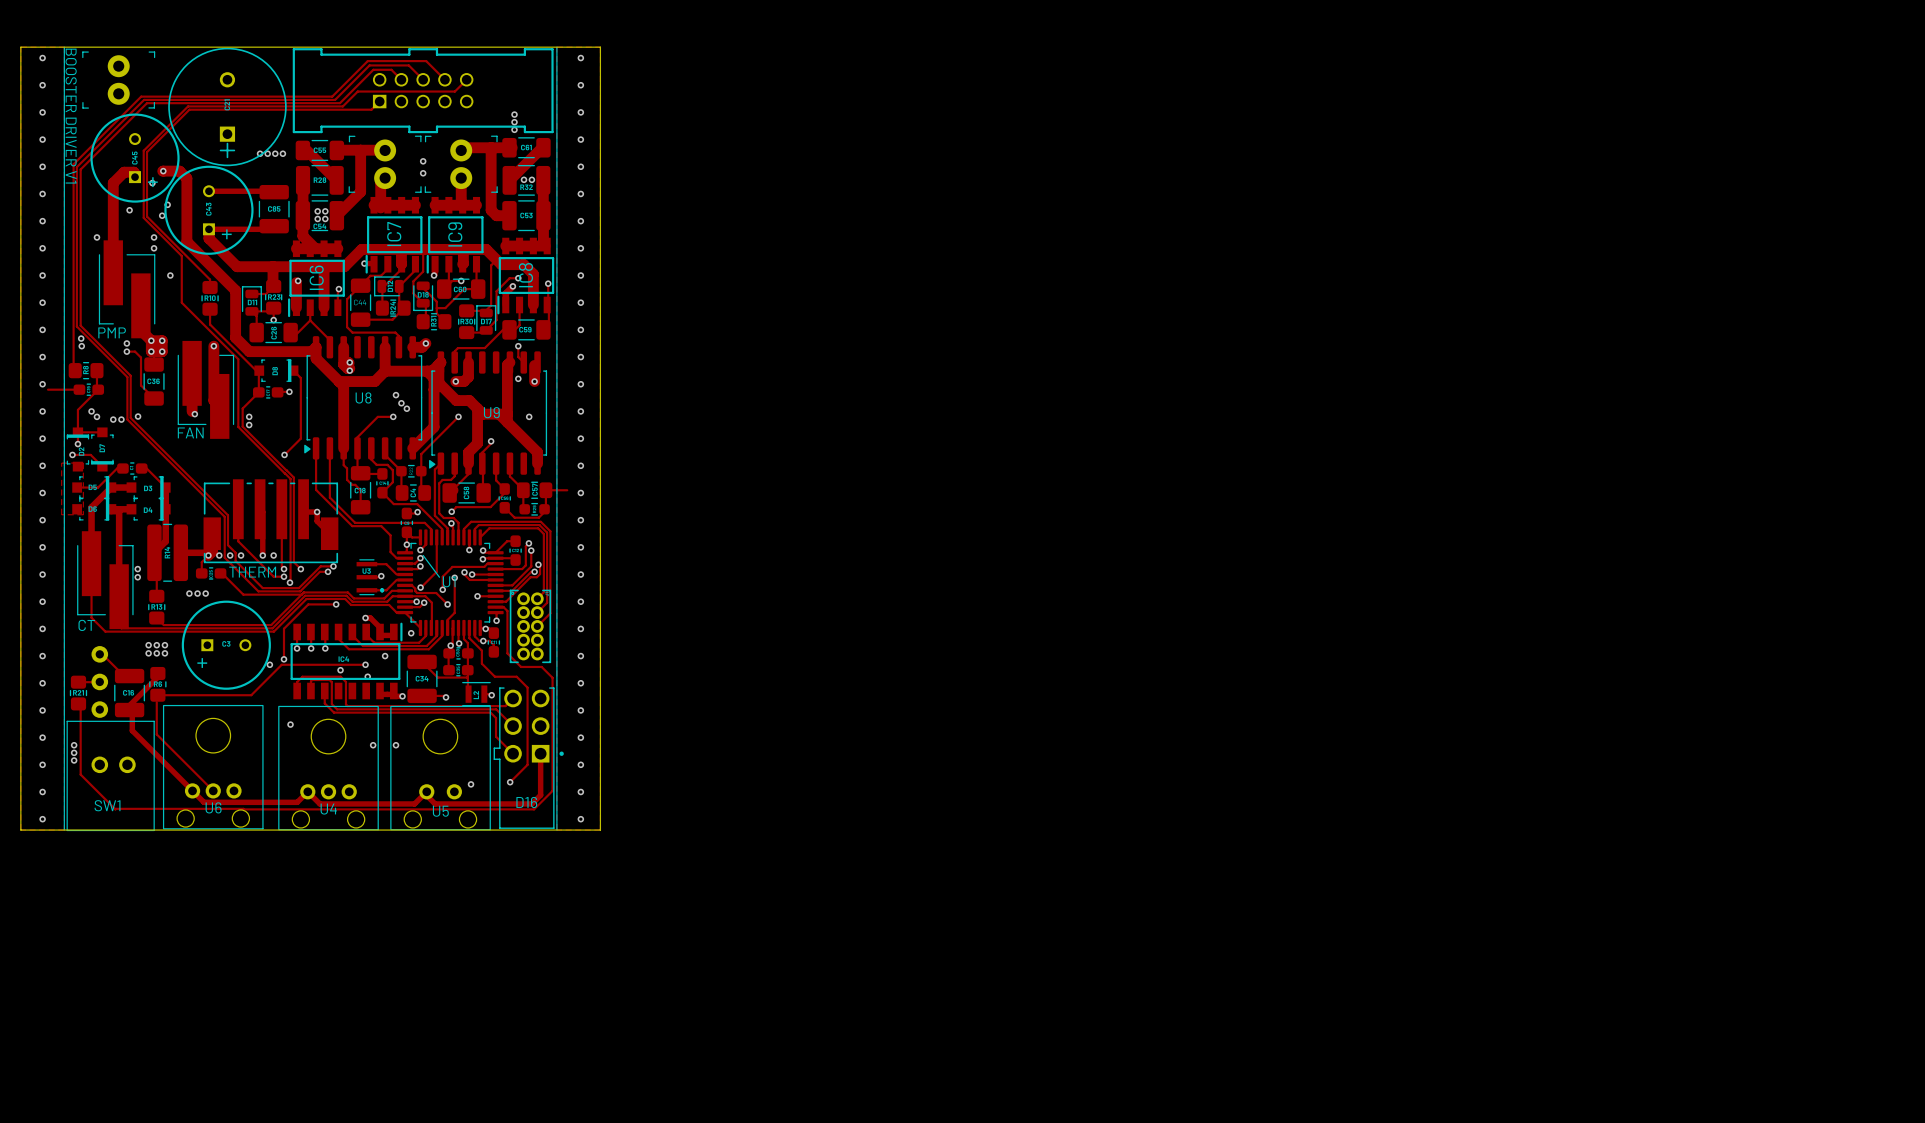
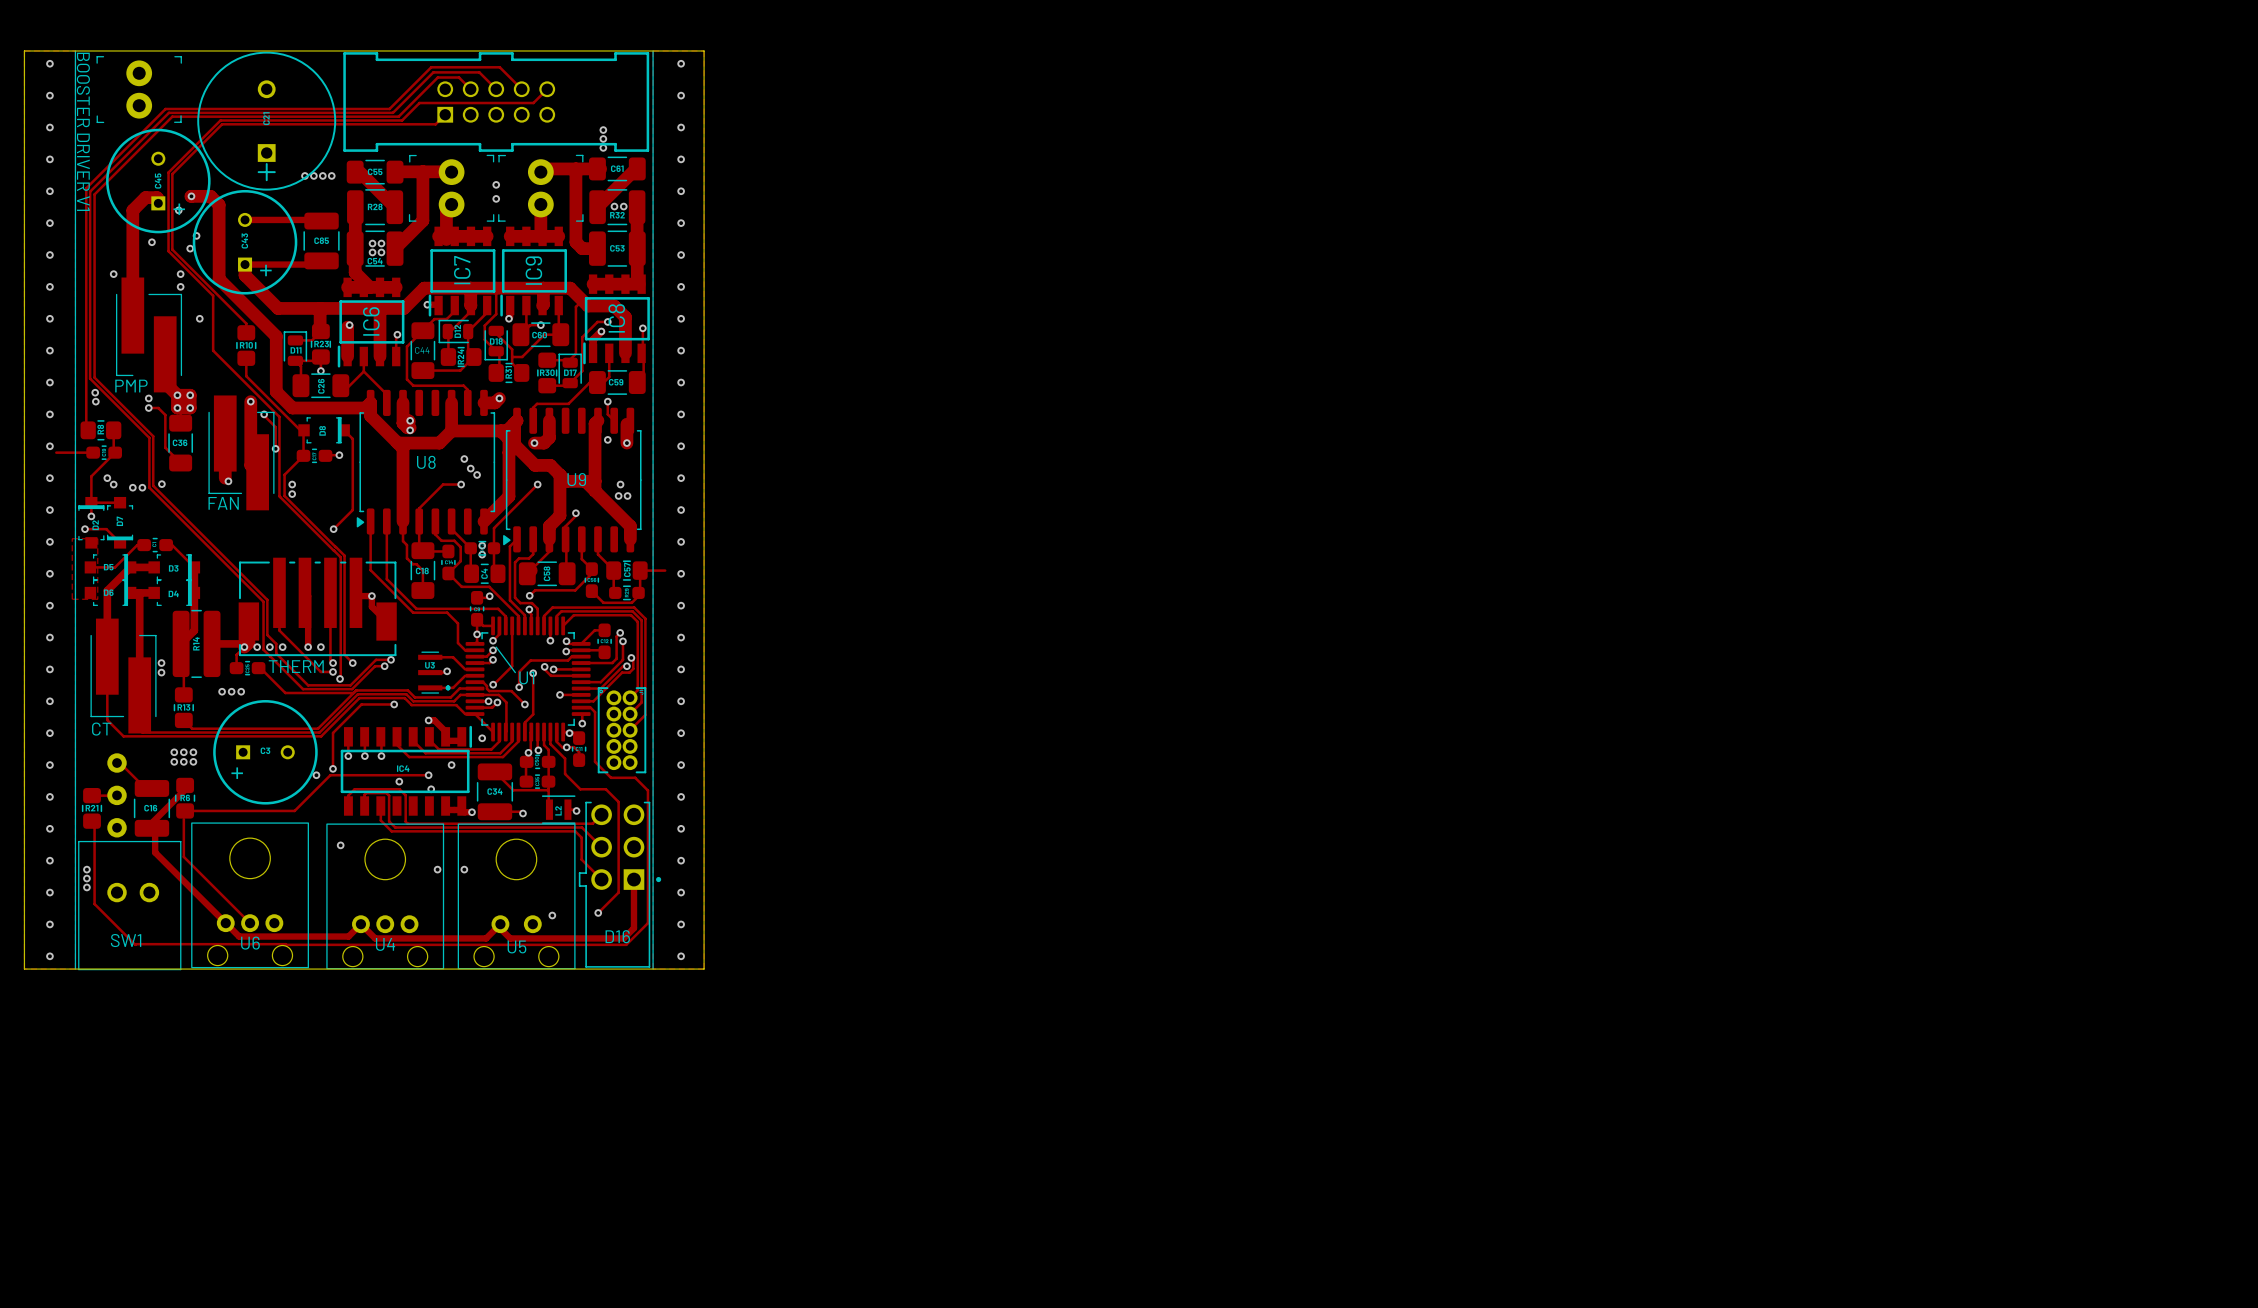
via: none -> (264, 414)
track: none -> (264, 415) (262, 414) (275, 427) (275, 448)
via: none -> (275, 448)
via: none -> (618, 496)
via: none -> (627, 496)
via: none -> (482, 545)
via: none -> (482, 554)

